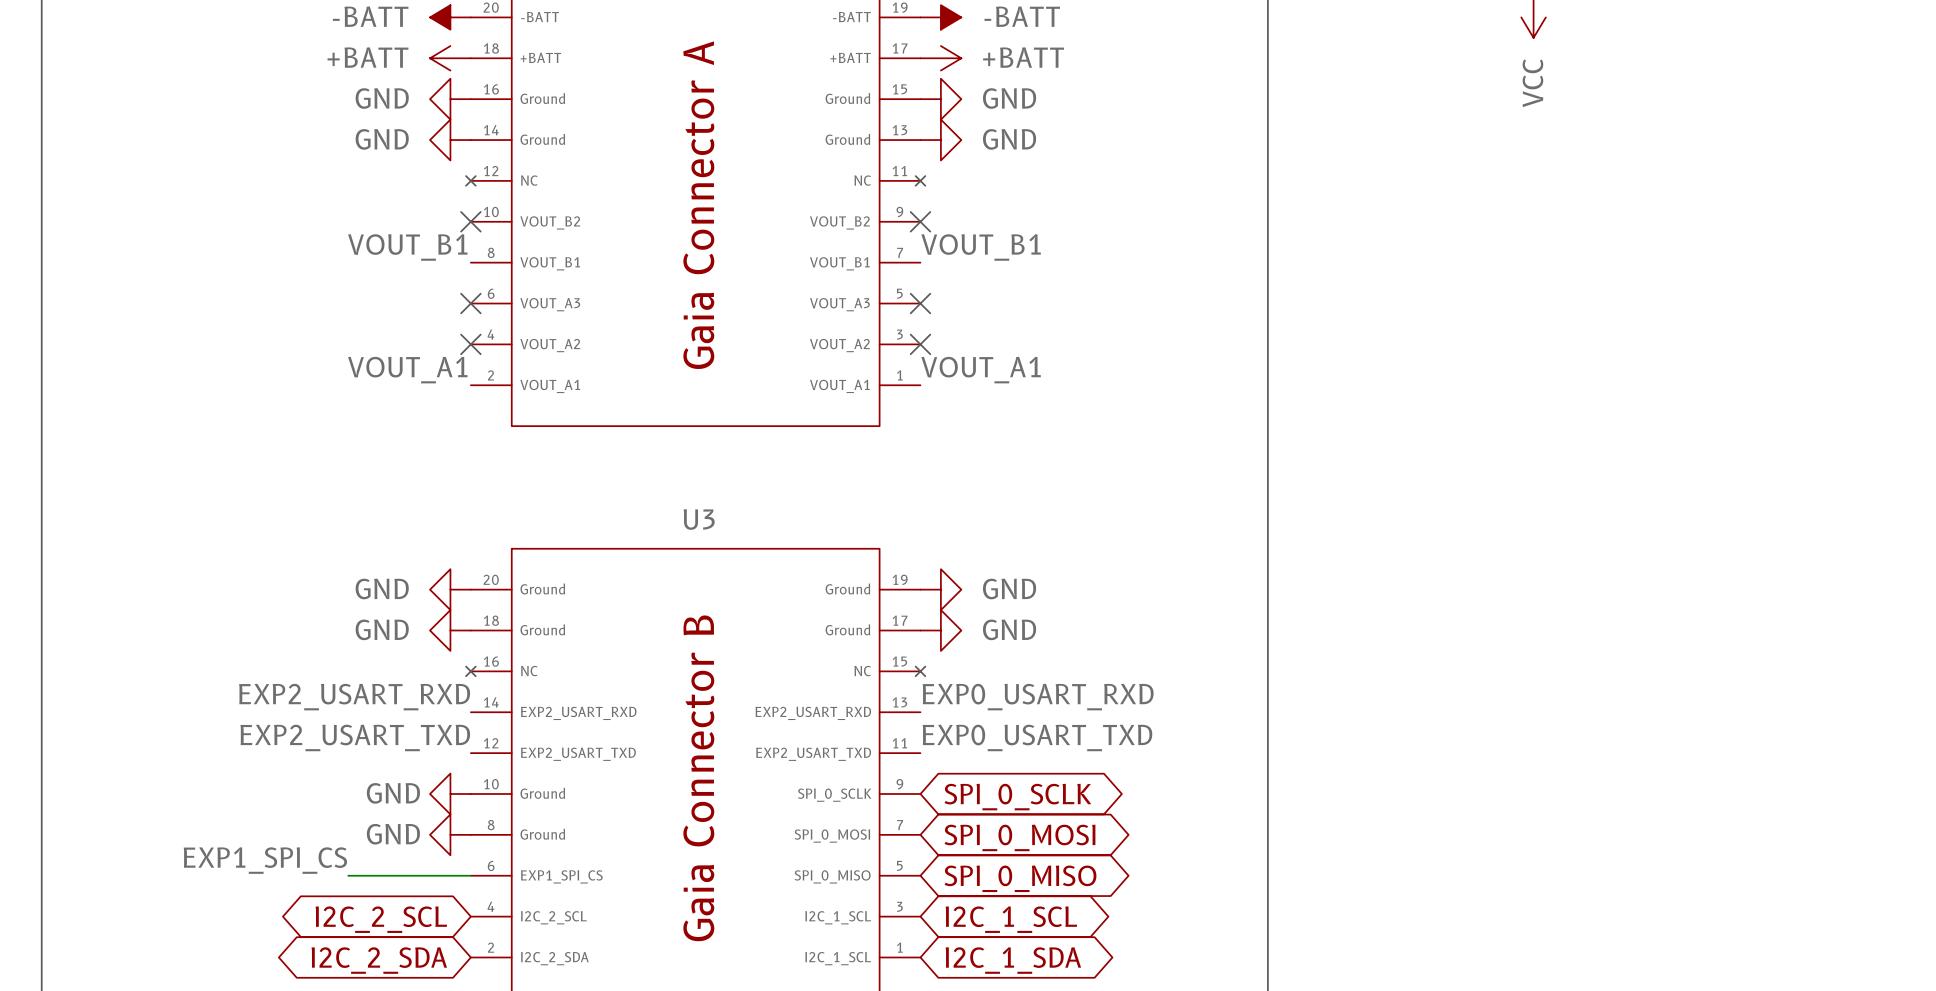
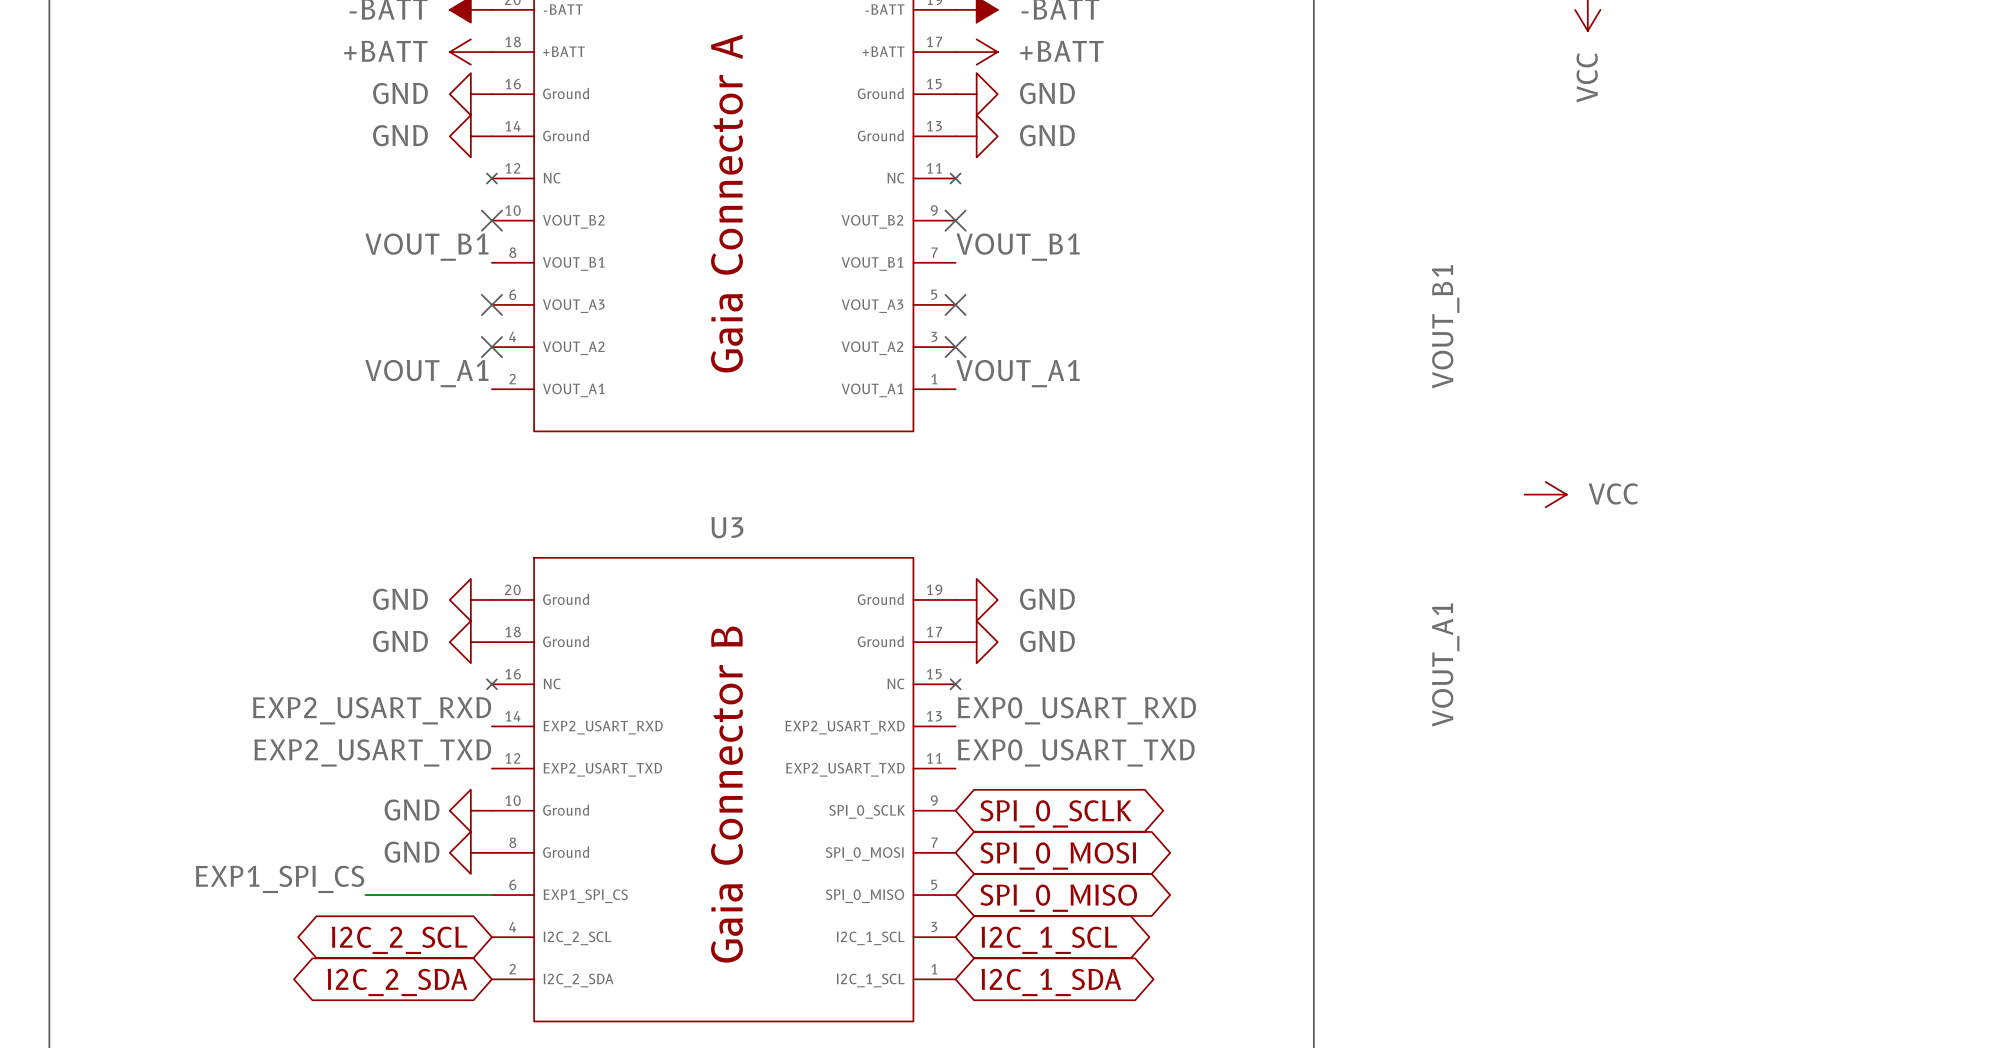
label: none -> VOUT_B1 (1445, 326)
power symbol: none -> VCC (1545, 494)
label: none -> VOUT_A1 (1445, 665)

